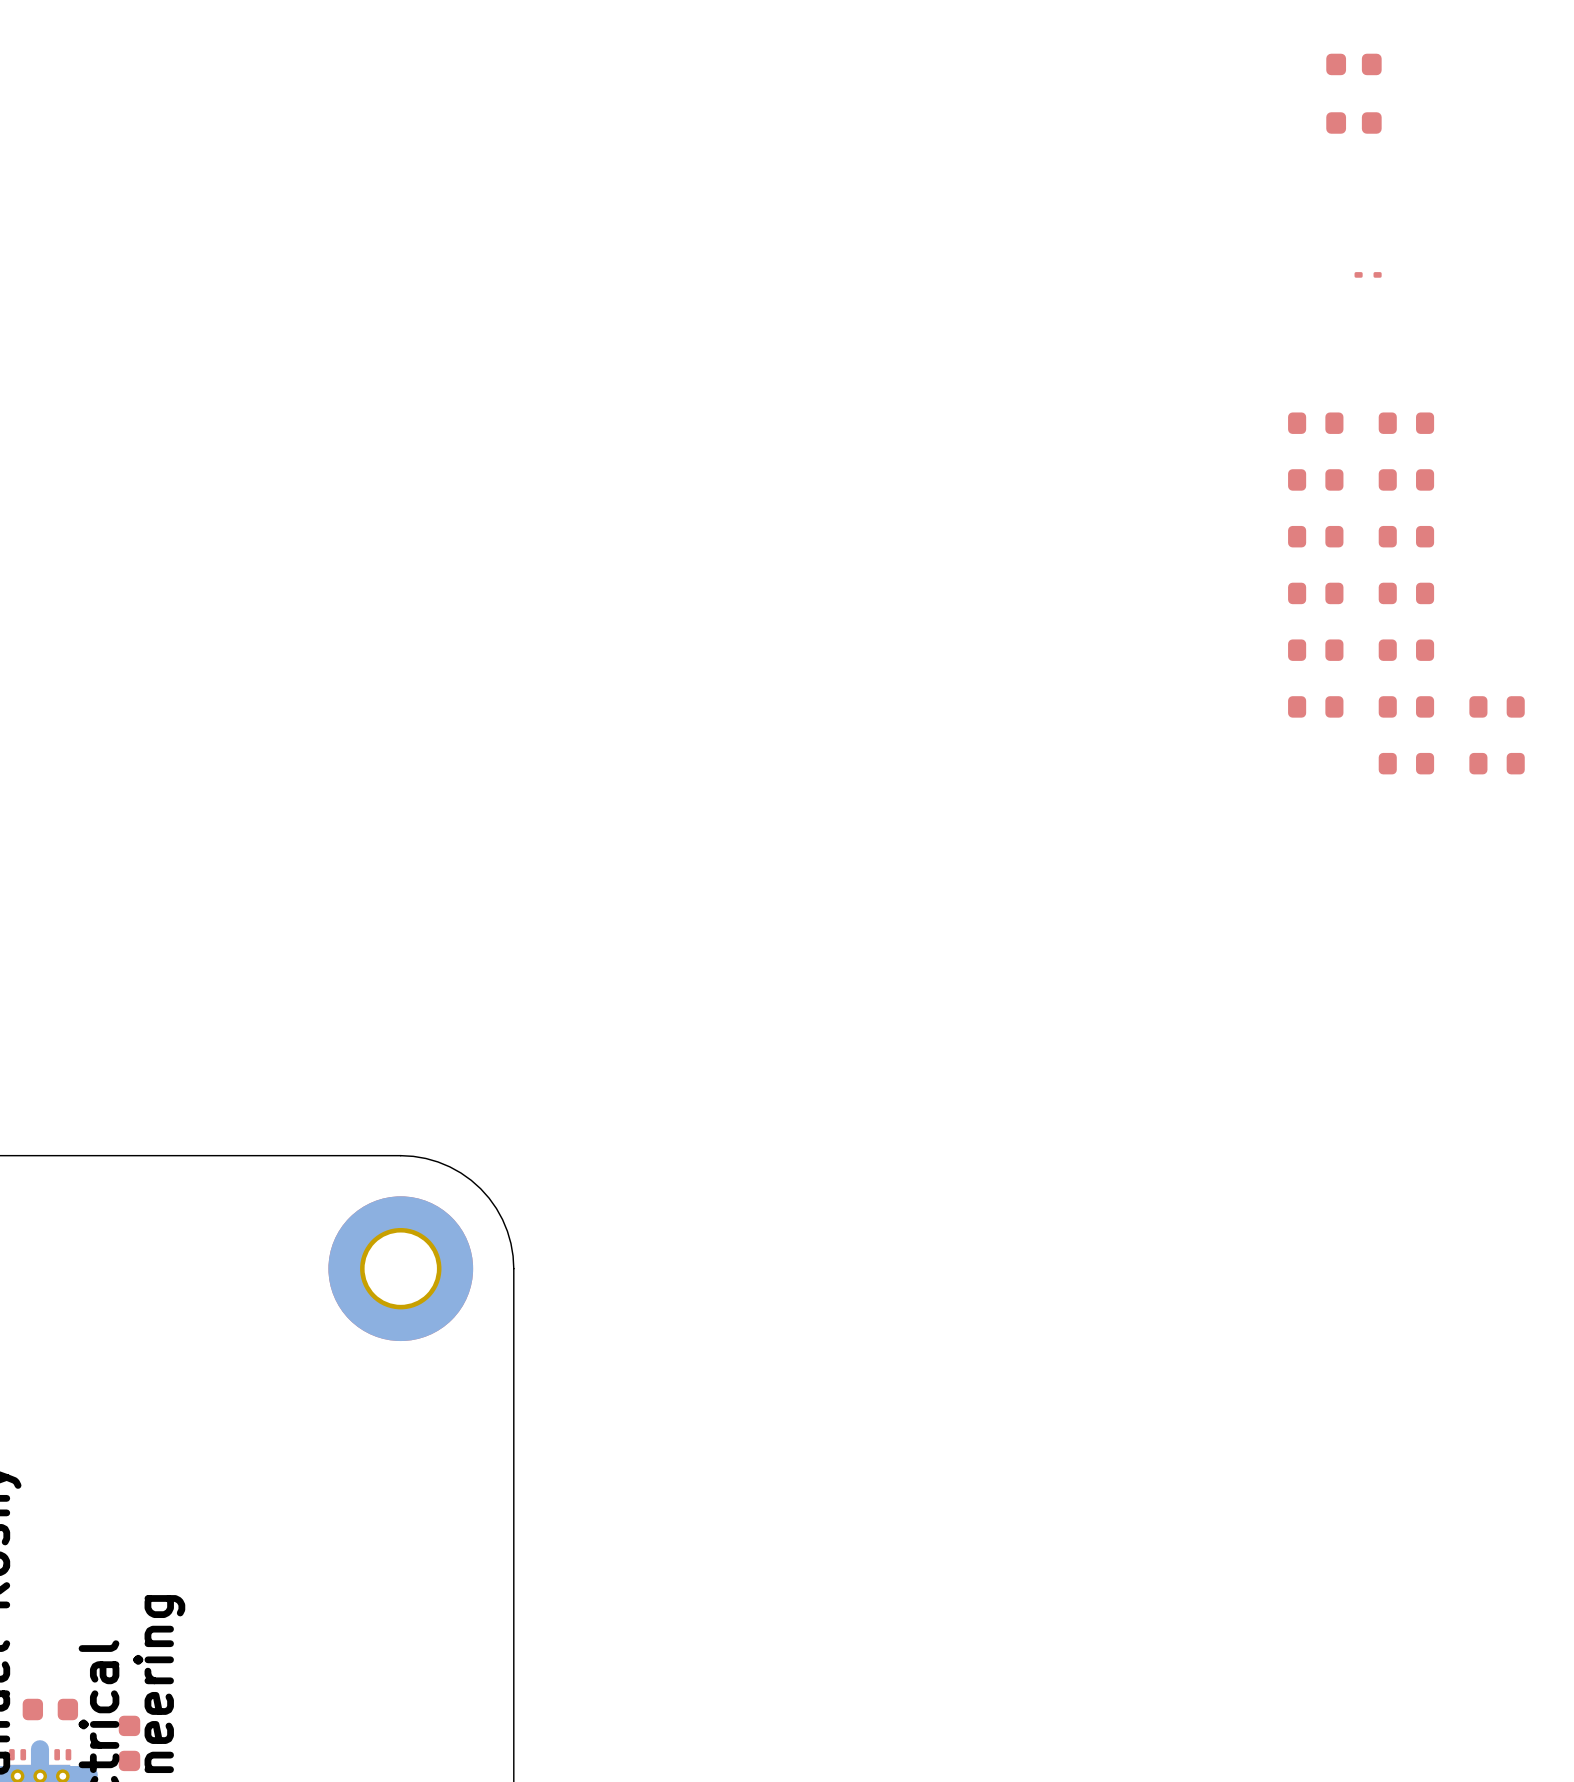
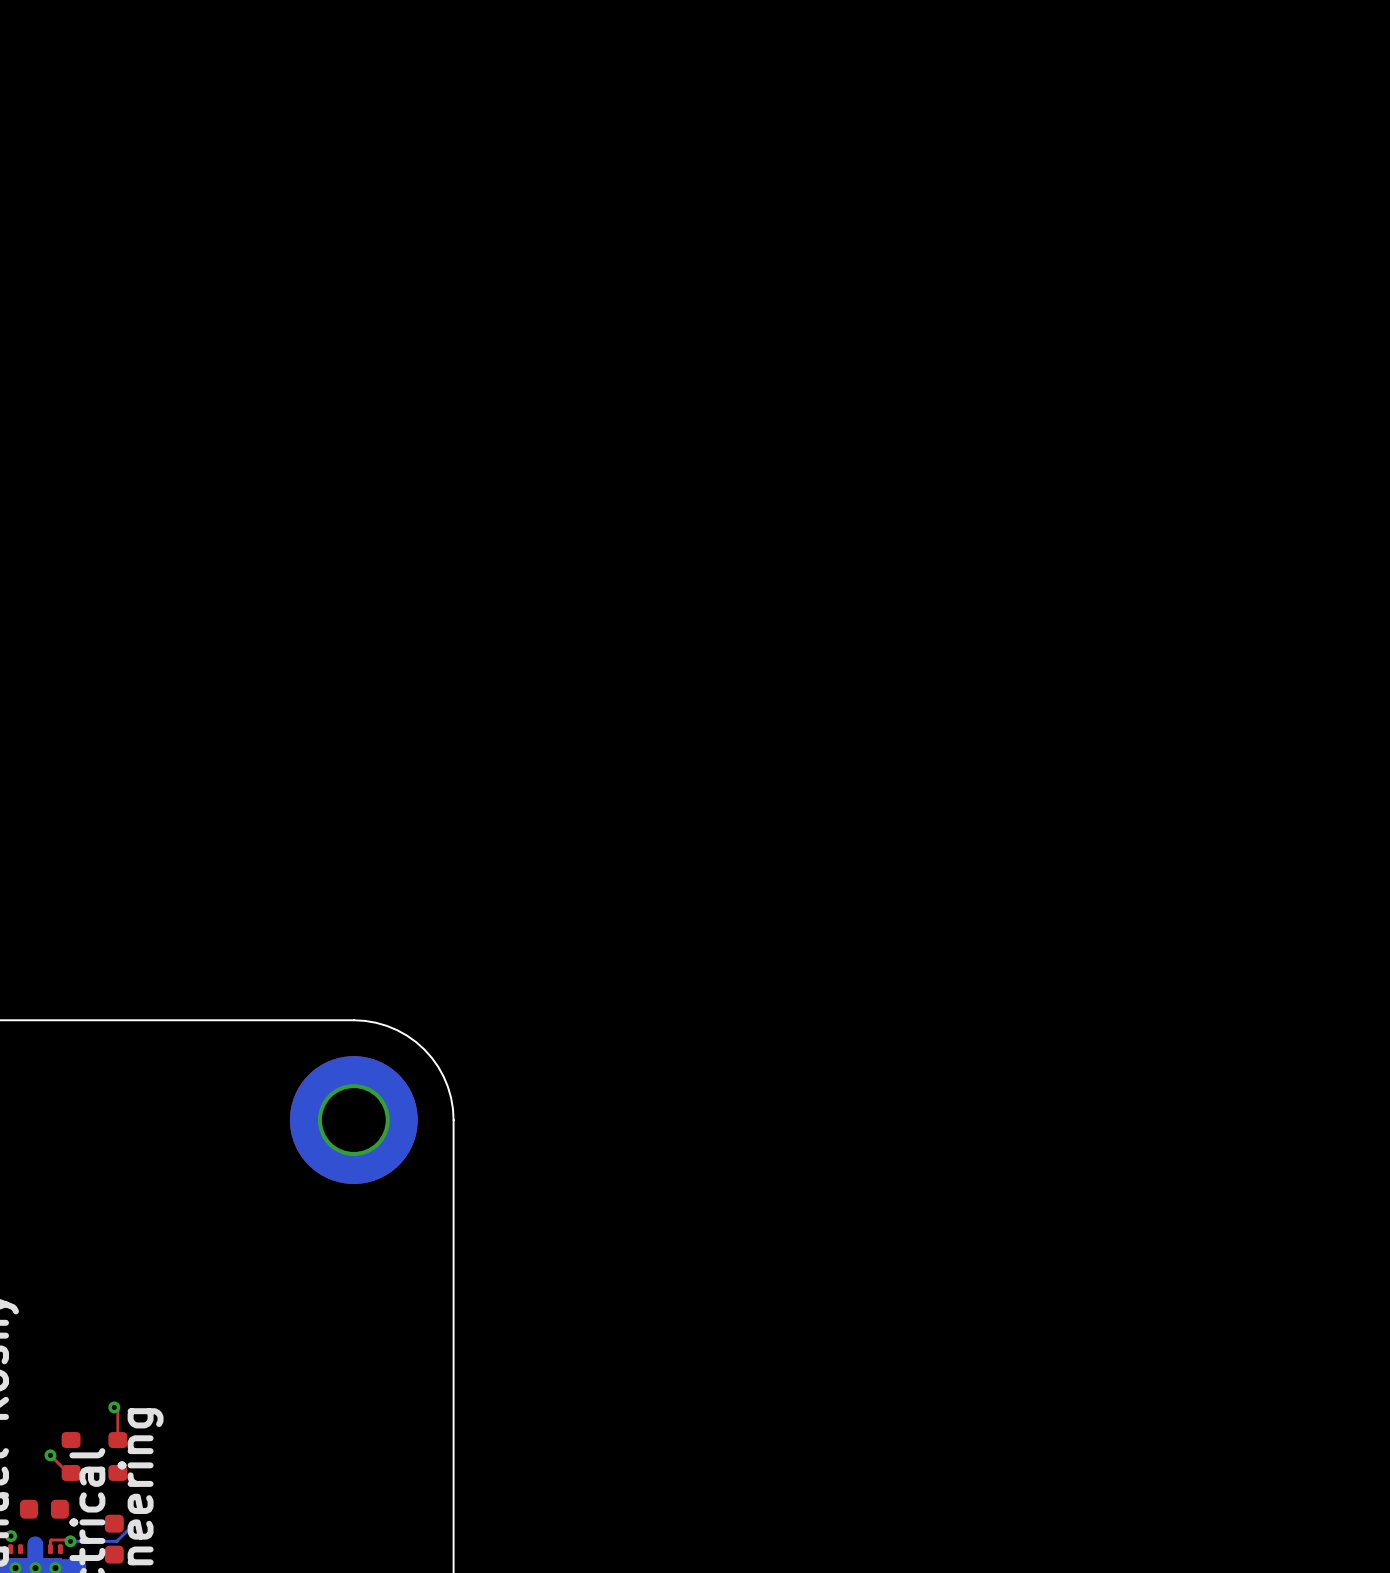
part: (1353, 64) -> none
part: (1353, 122) -> none
part: (1368, 274) -> none
part: (1315, 423) -> none
part: (1406, 423) -> none
part: (1315, 479) -> none
part: (1406, 479) -> none
part: (1315, 536) -> none
part: (1406, 536) -> none
part: (1315, 593) -> none
part: (1406, 593) -> none
part: (1315, 650) -> none
part: (1406, 650) -> none
part: (1315, 706) -> none
part: (1406, 706) -> none
part: (1497, 706) -> none
part: (1406, 763) -> none
part: (1497, 763) -> none
top track: none -> (114, 1407) (117, 1410) (117, 1440)
via: none -> (114, 1407)
top track: none -> (50, 1455) (68, 1472) (71, 1472)
via: none -> (50, 1455)
part: none -> (71, 1456)
part: none -> (117, 1456)
bottom track: none -> (132, 1526) (116, 1541) (70, 1541)
via: none -> (11, 1536)
top track: none -> (70, 1541) (51, 1539) (50, 1549)
via: none -> (70, 1541)

